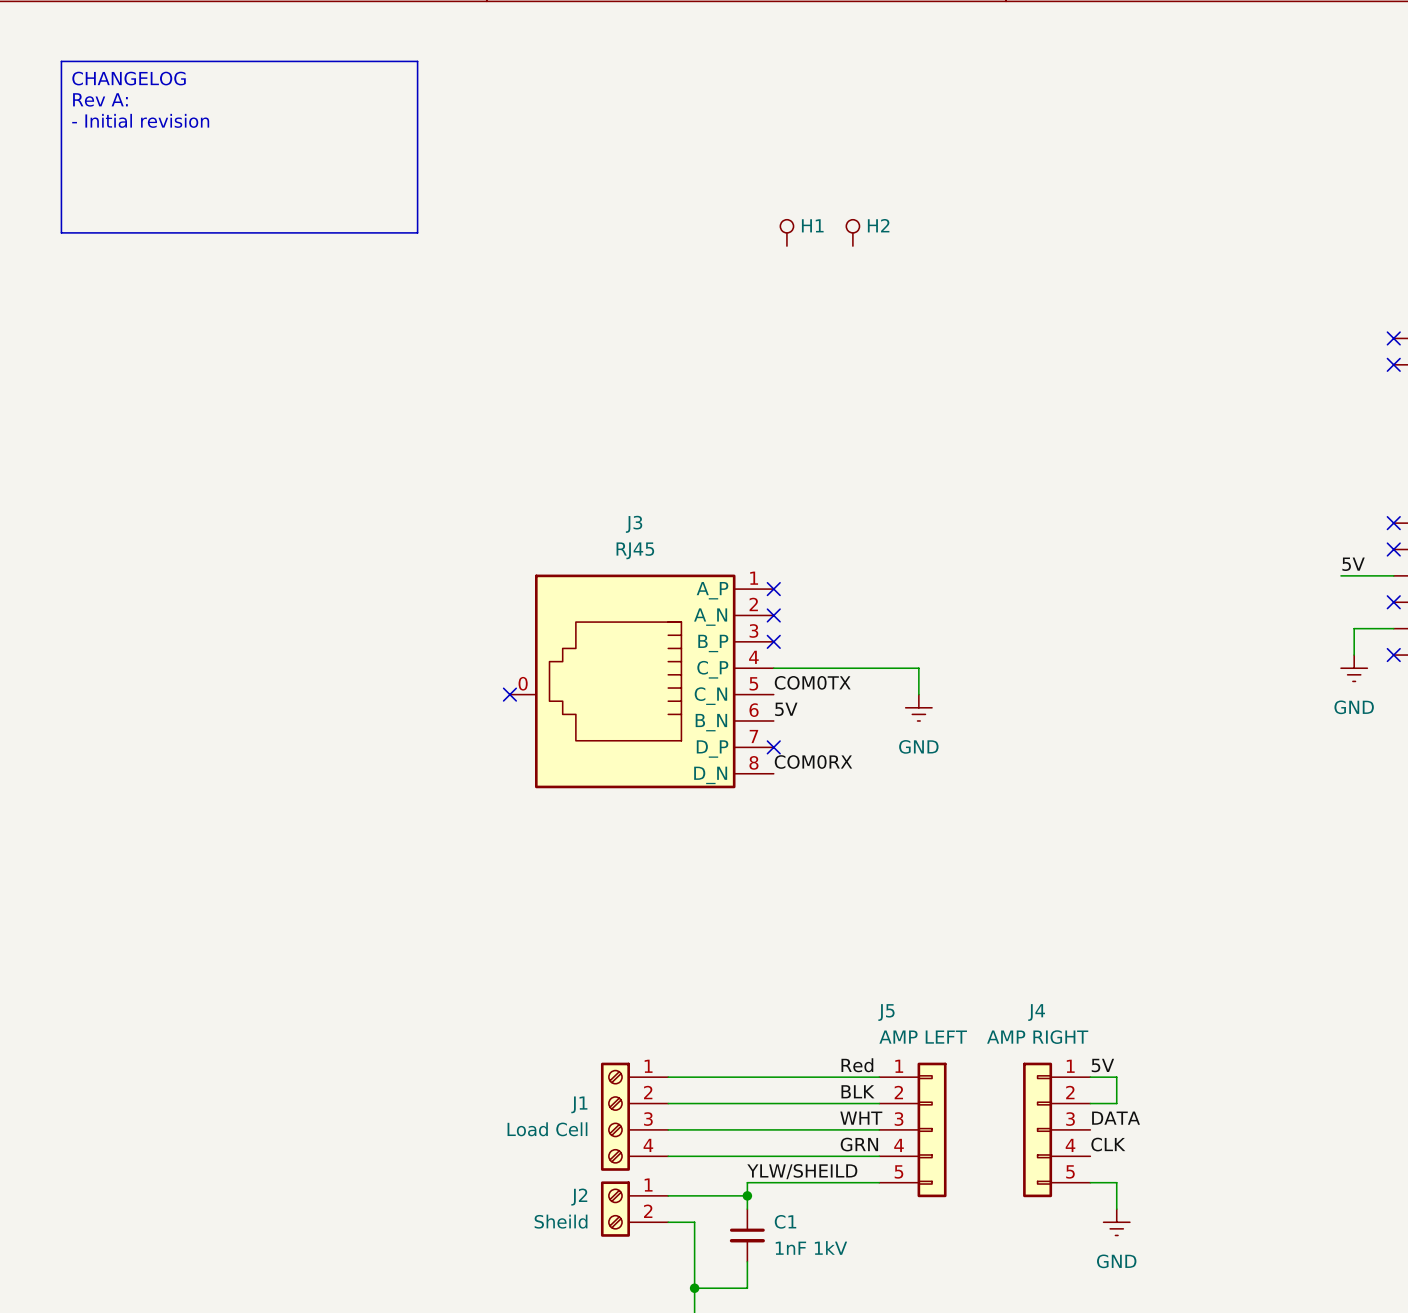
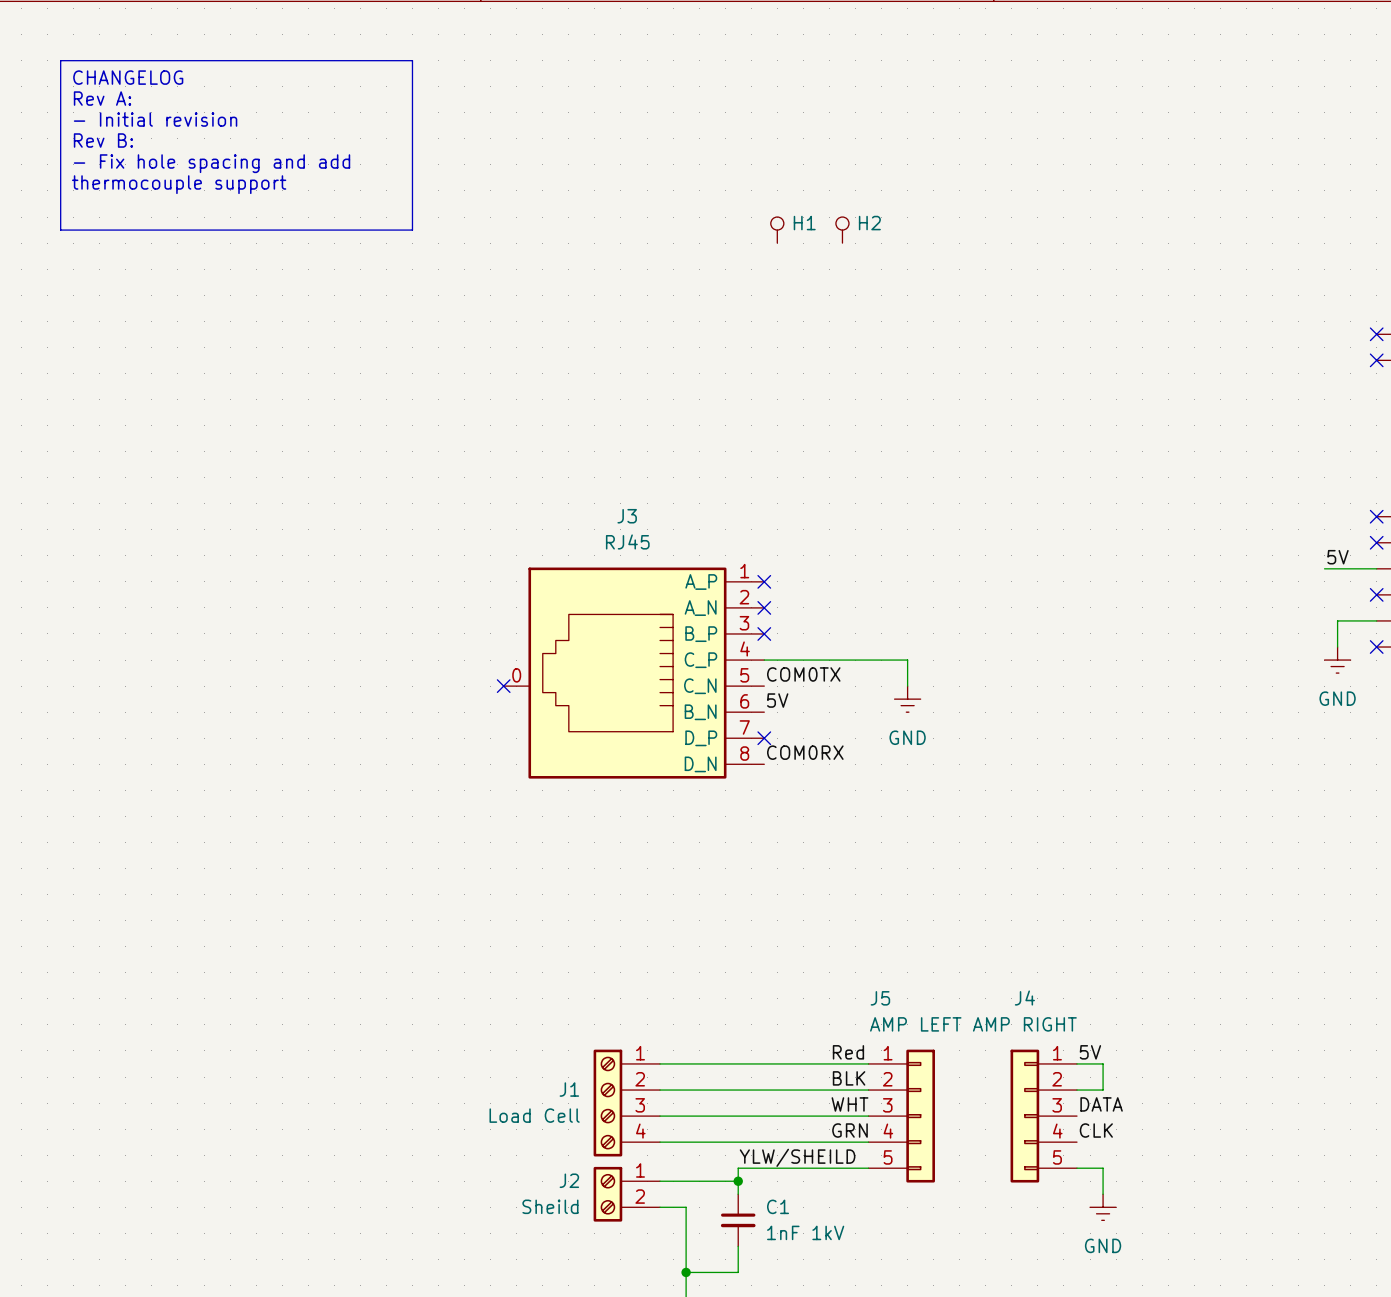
text: none -> Rev B: (103, 140)
text: none -> - Fix hole spacing and add (212, 163)
text: none -> thermocouple support (179, 184)

